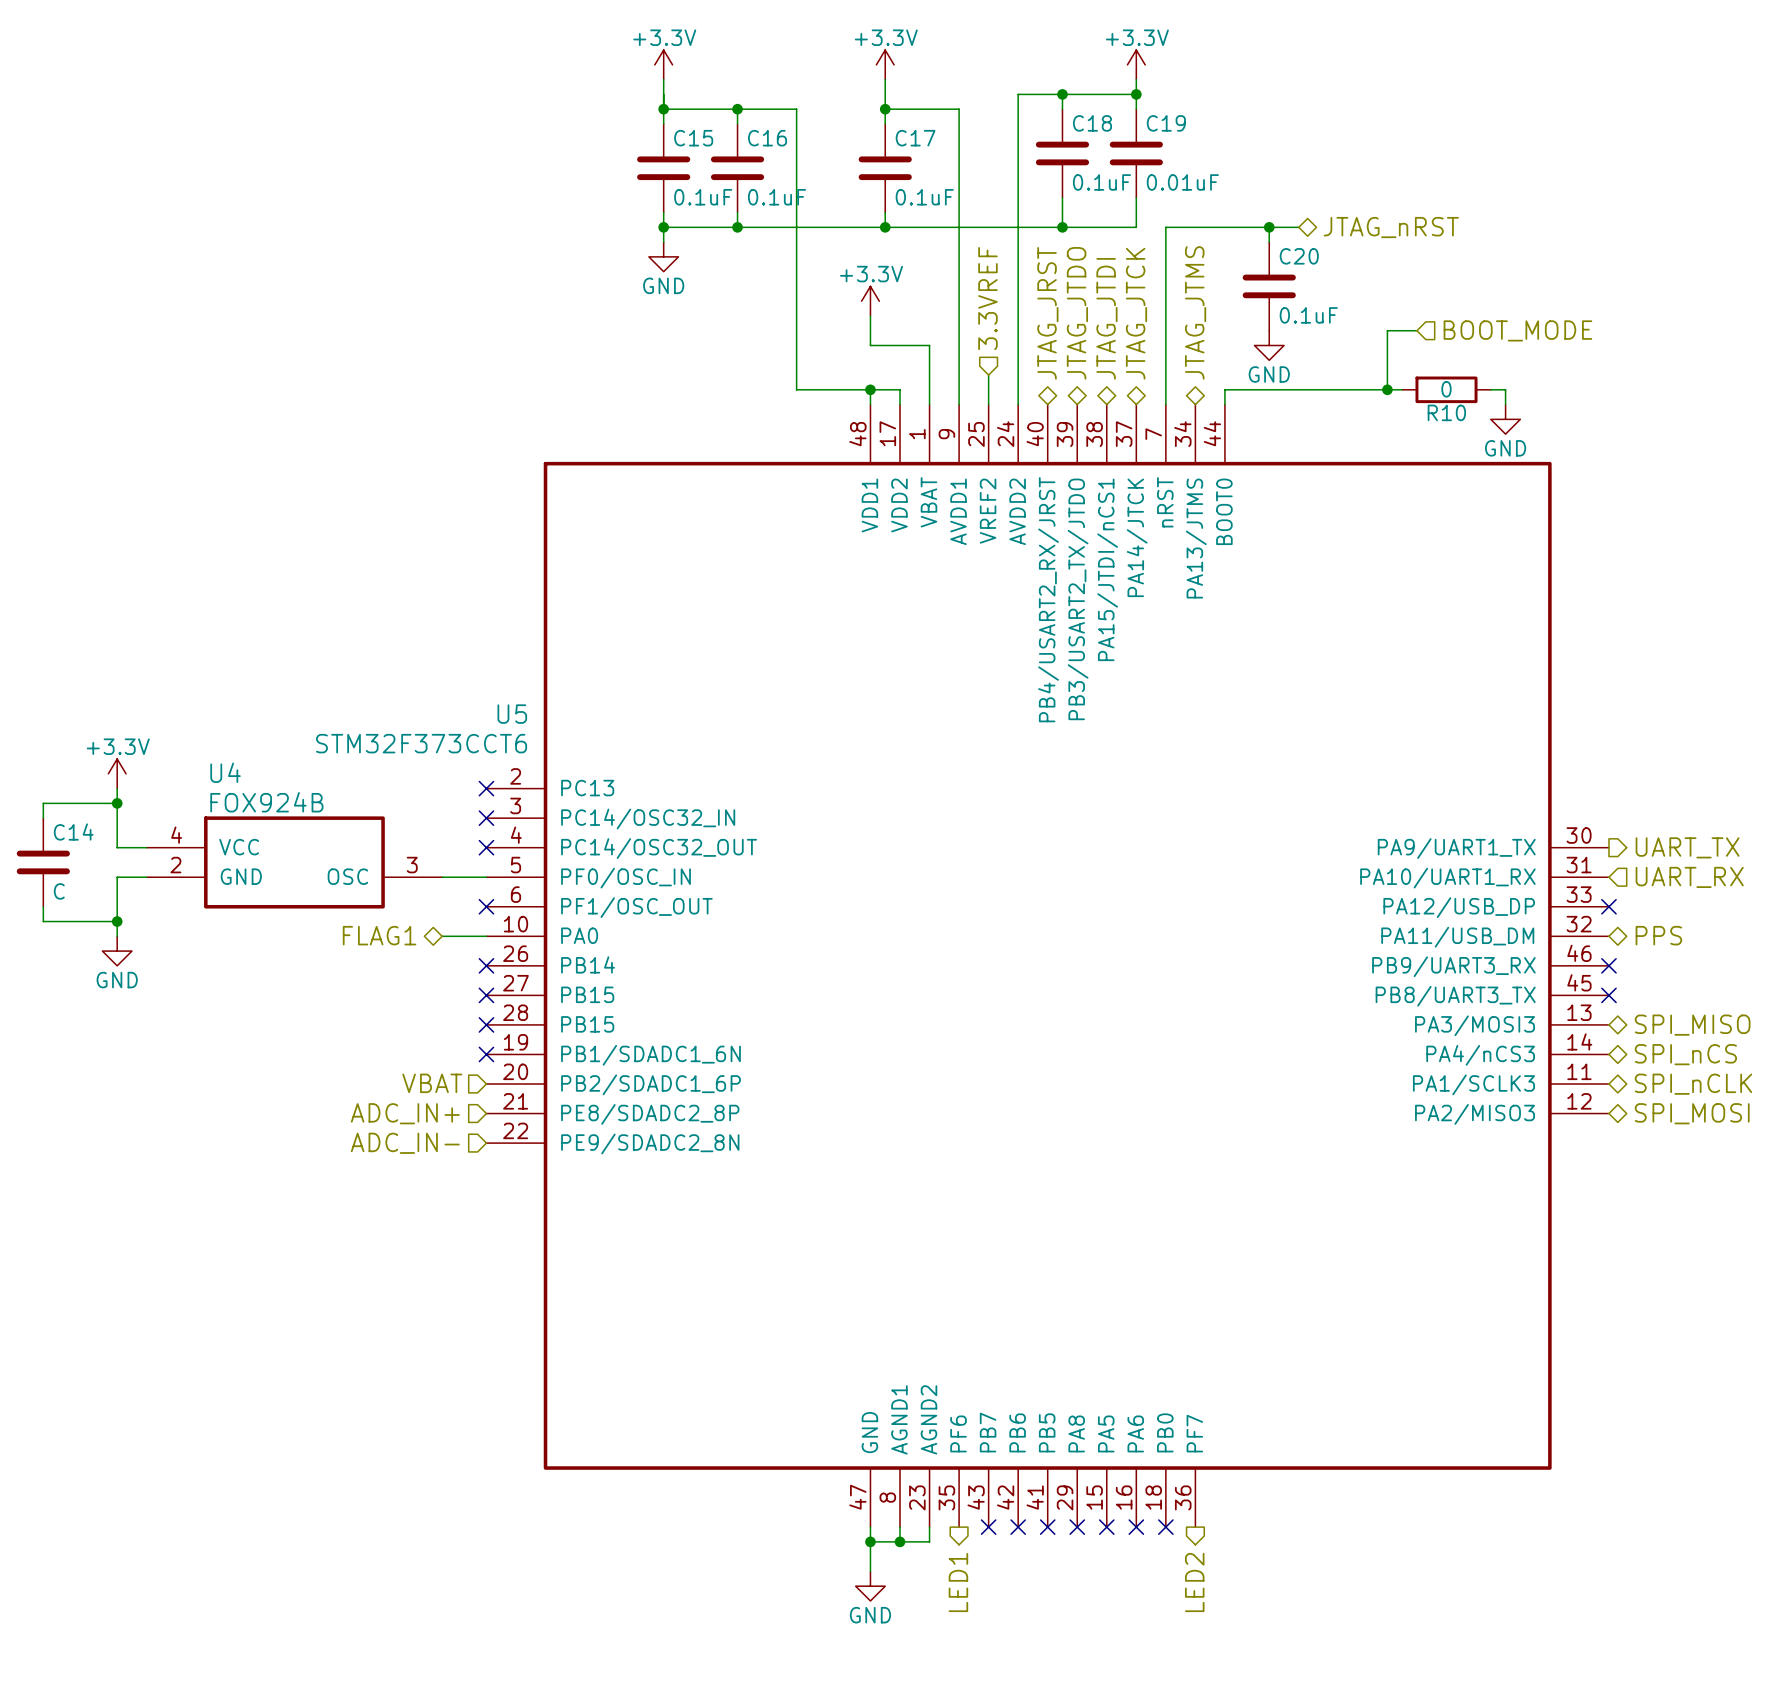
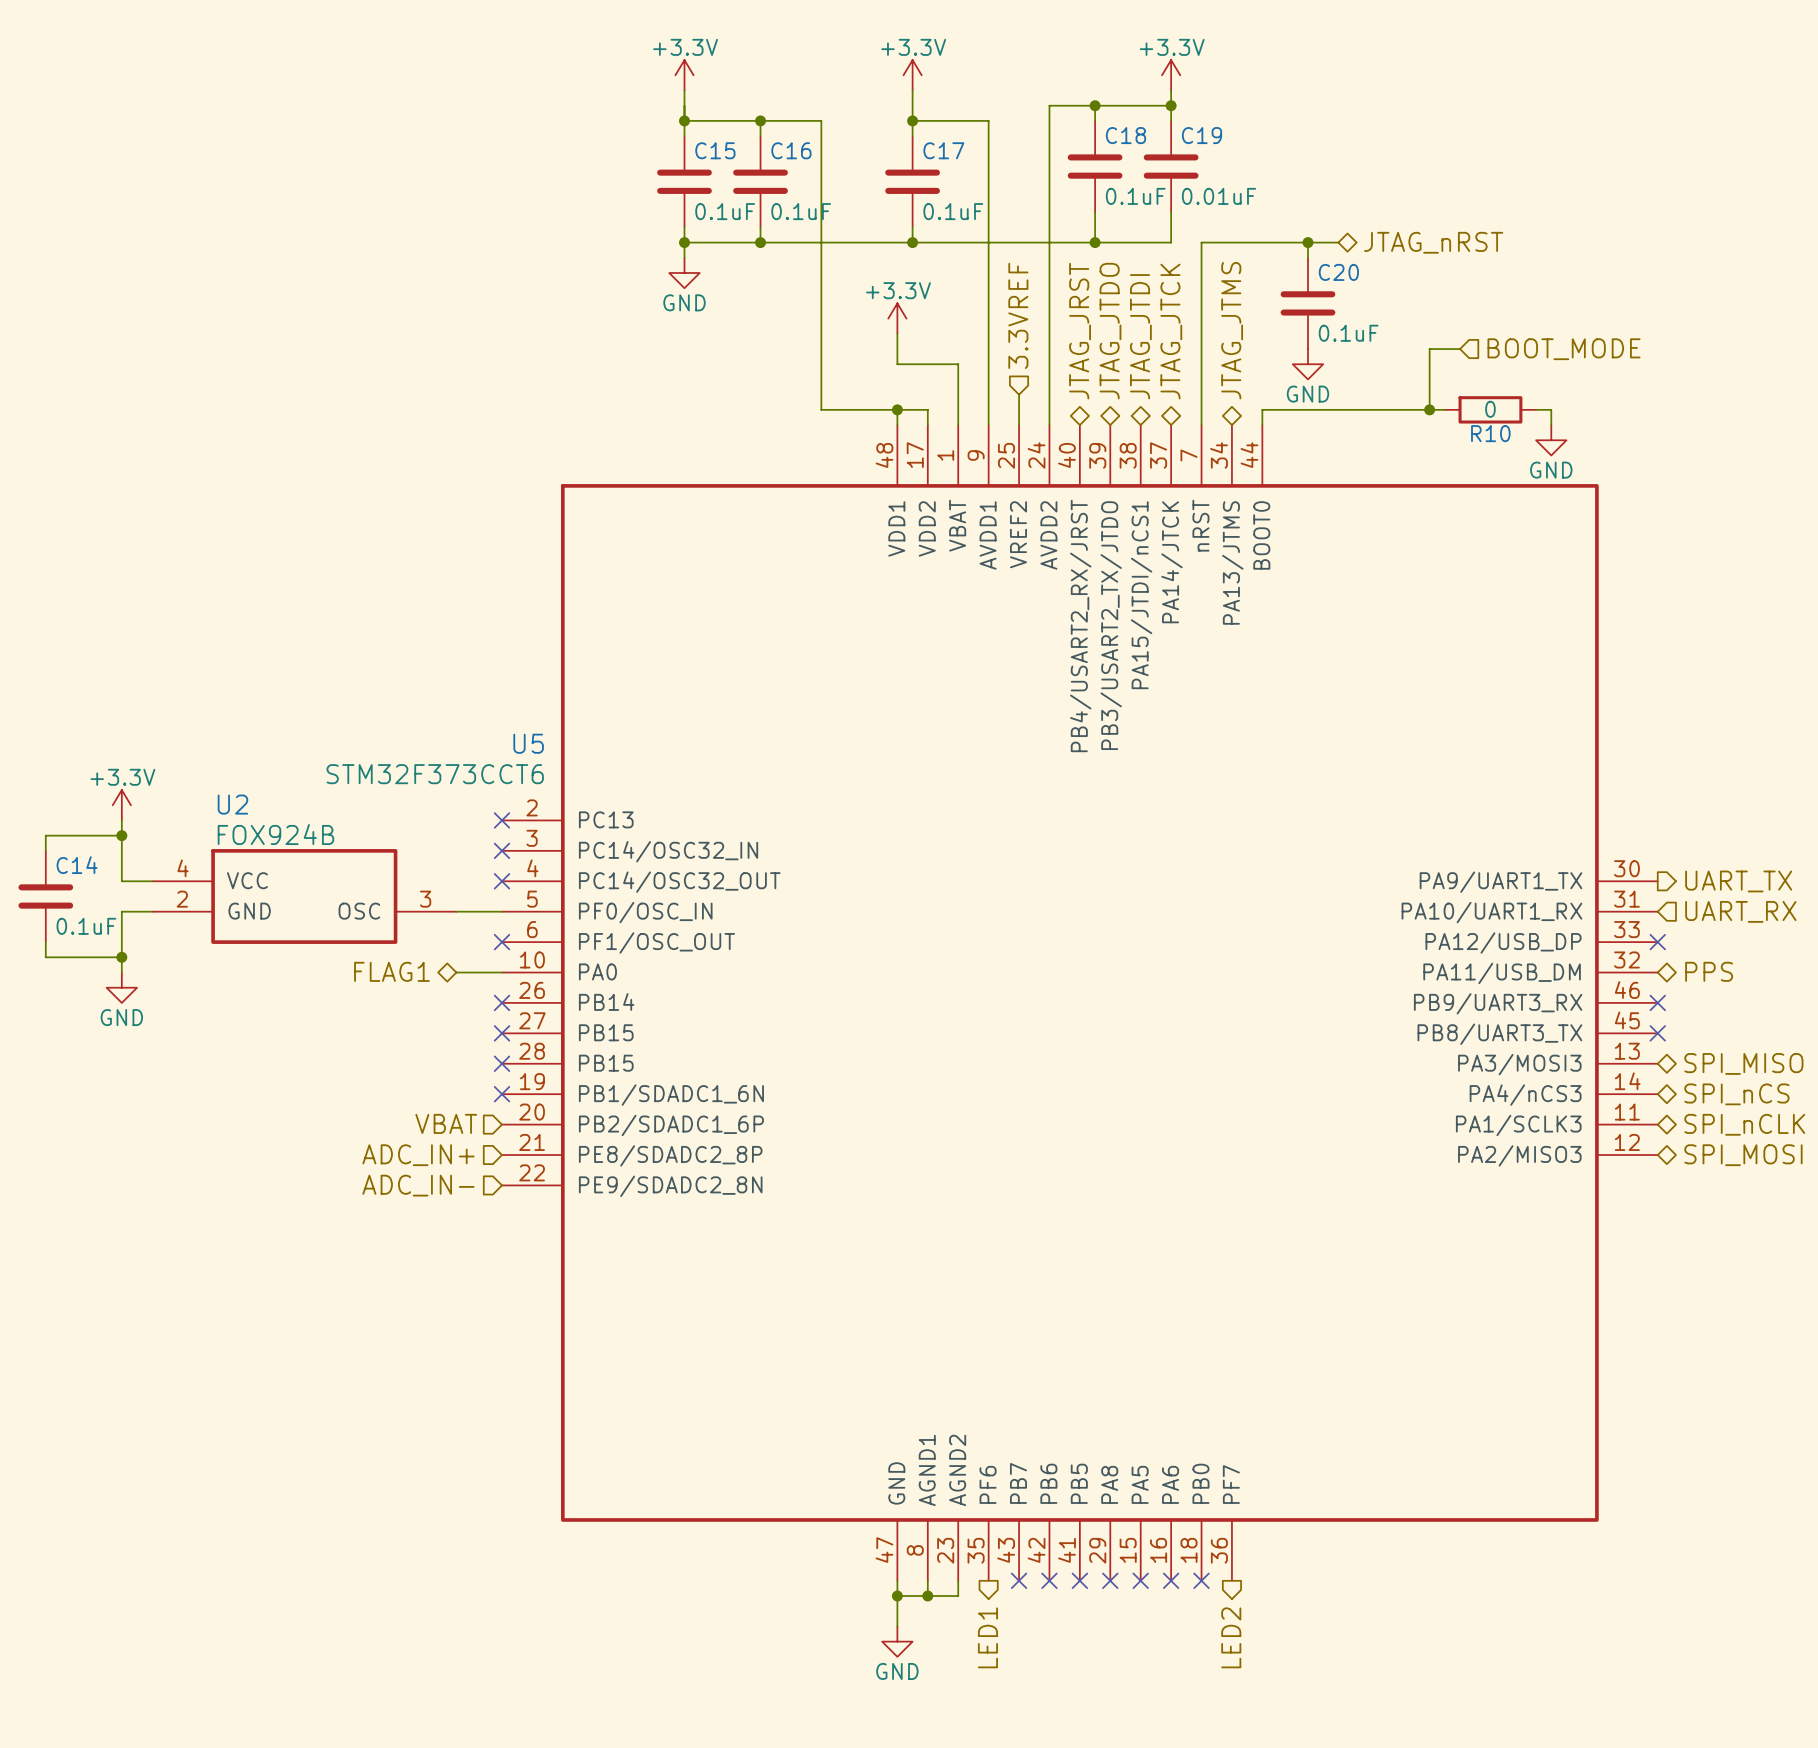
U4 name: U4 (225, 772) -> U2 (232, 804)
C14 value: C (59, 891) -> 0.1uF (86, 926)

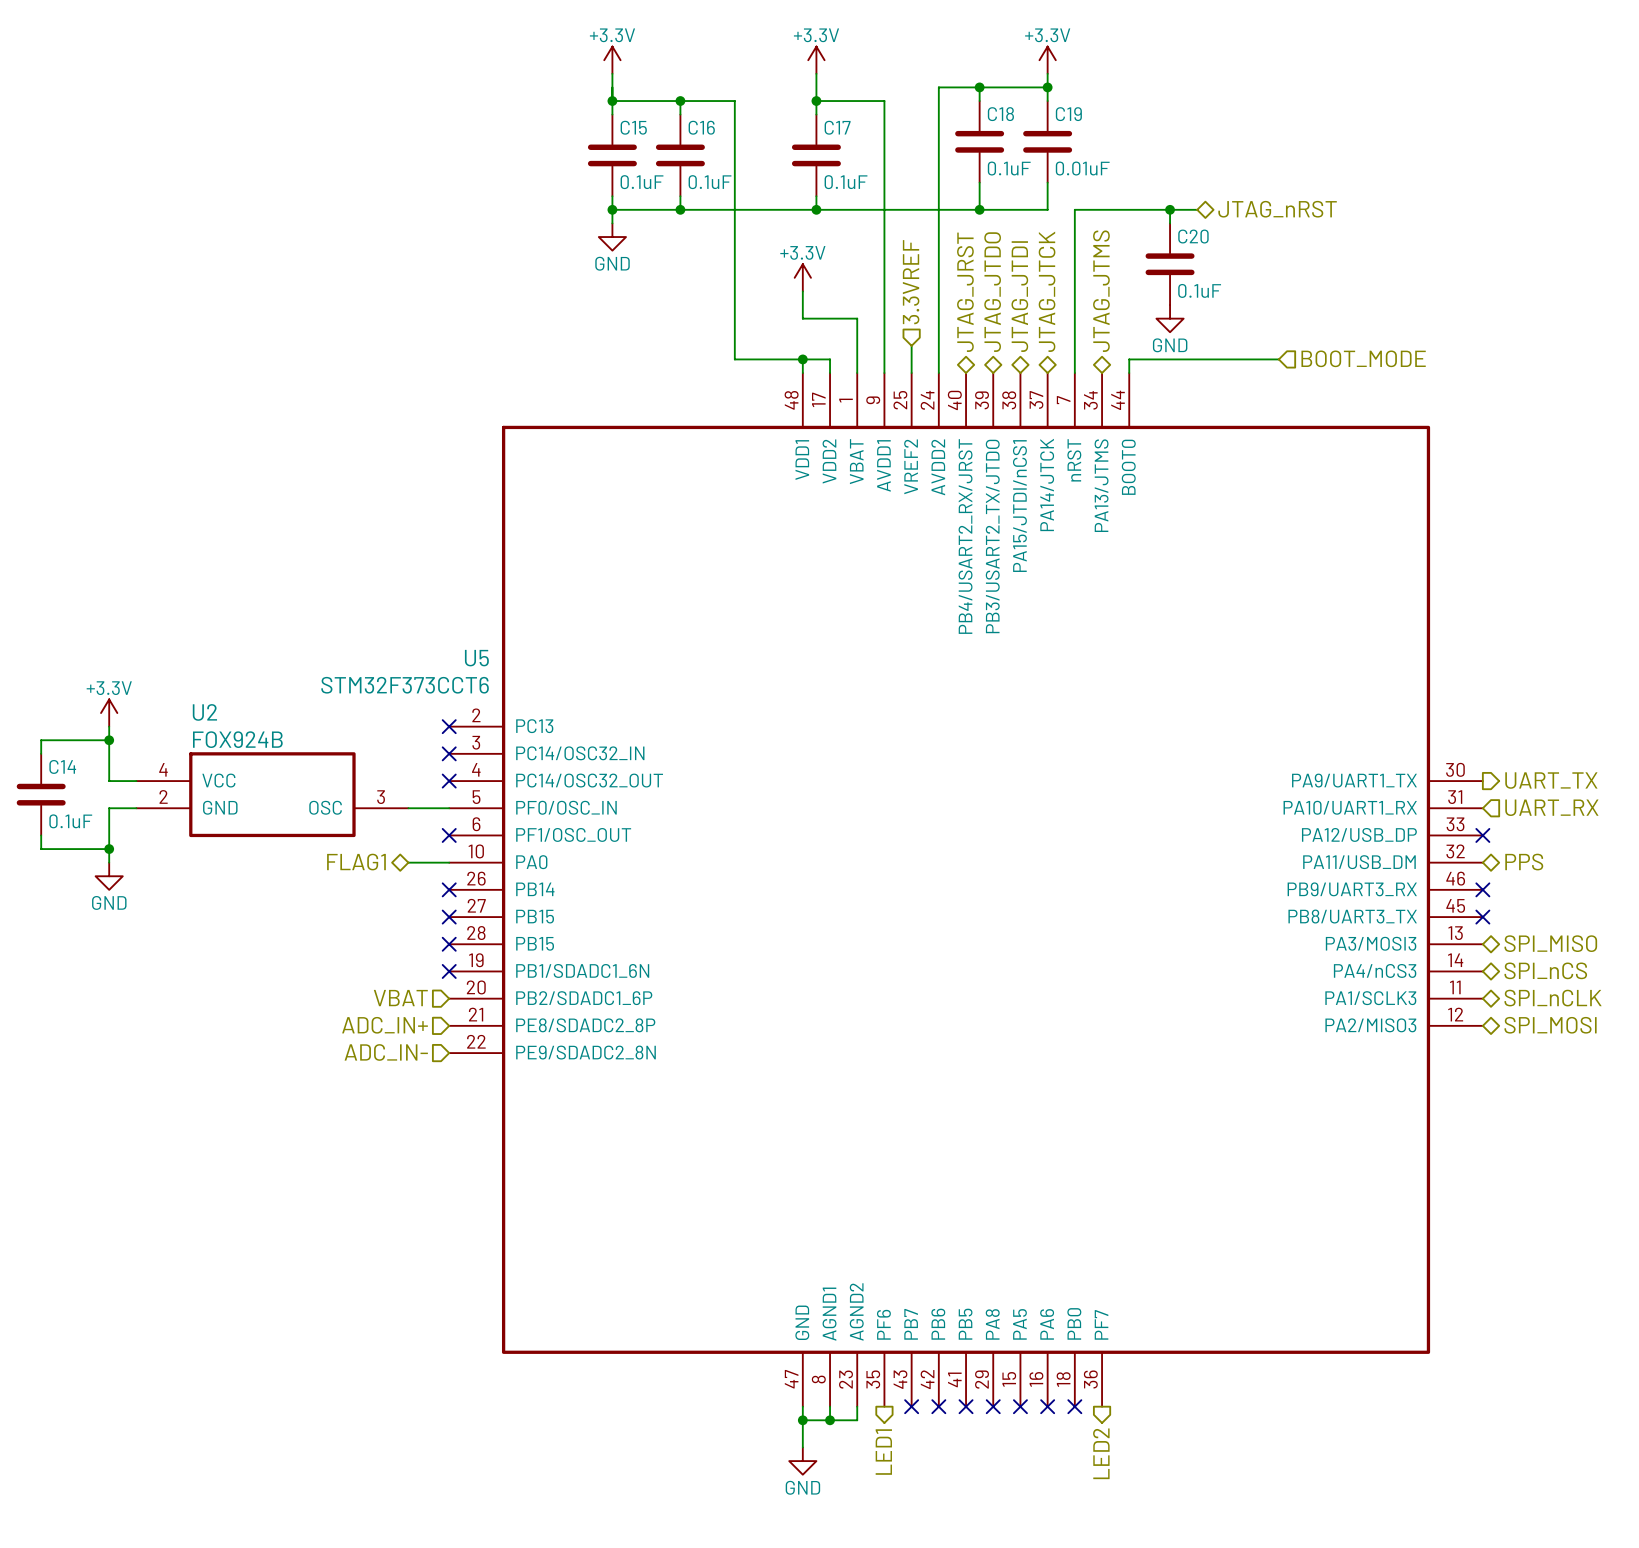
wire: (1460, 349) (1429, 349) (1429, 409) (1444, 409) -> none
hierarchical label position: BOOT_MODE (1564, 349) -> BOOT_MODE (1363, 358)
junction: (1429, 409) -> none
R10: 0 (1490, 409) -> none
wire: (1536, 409) (1551, 409) (1551, 425) -> none
power symbol: GND (1551, 440) -> none

